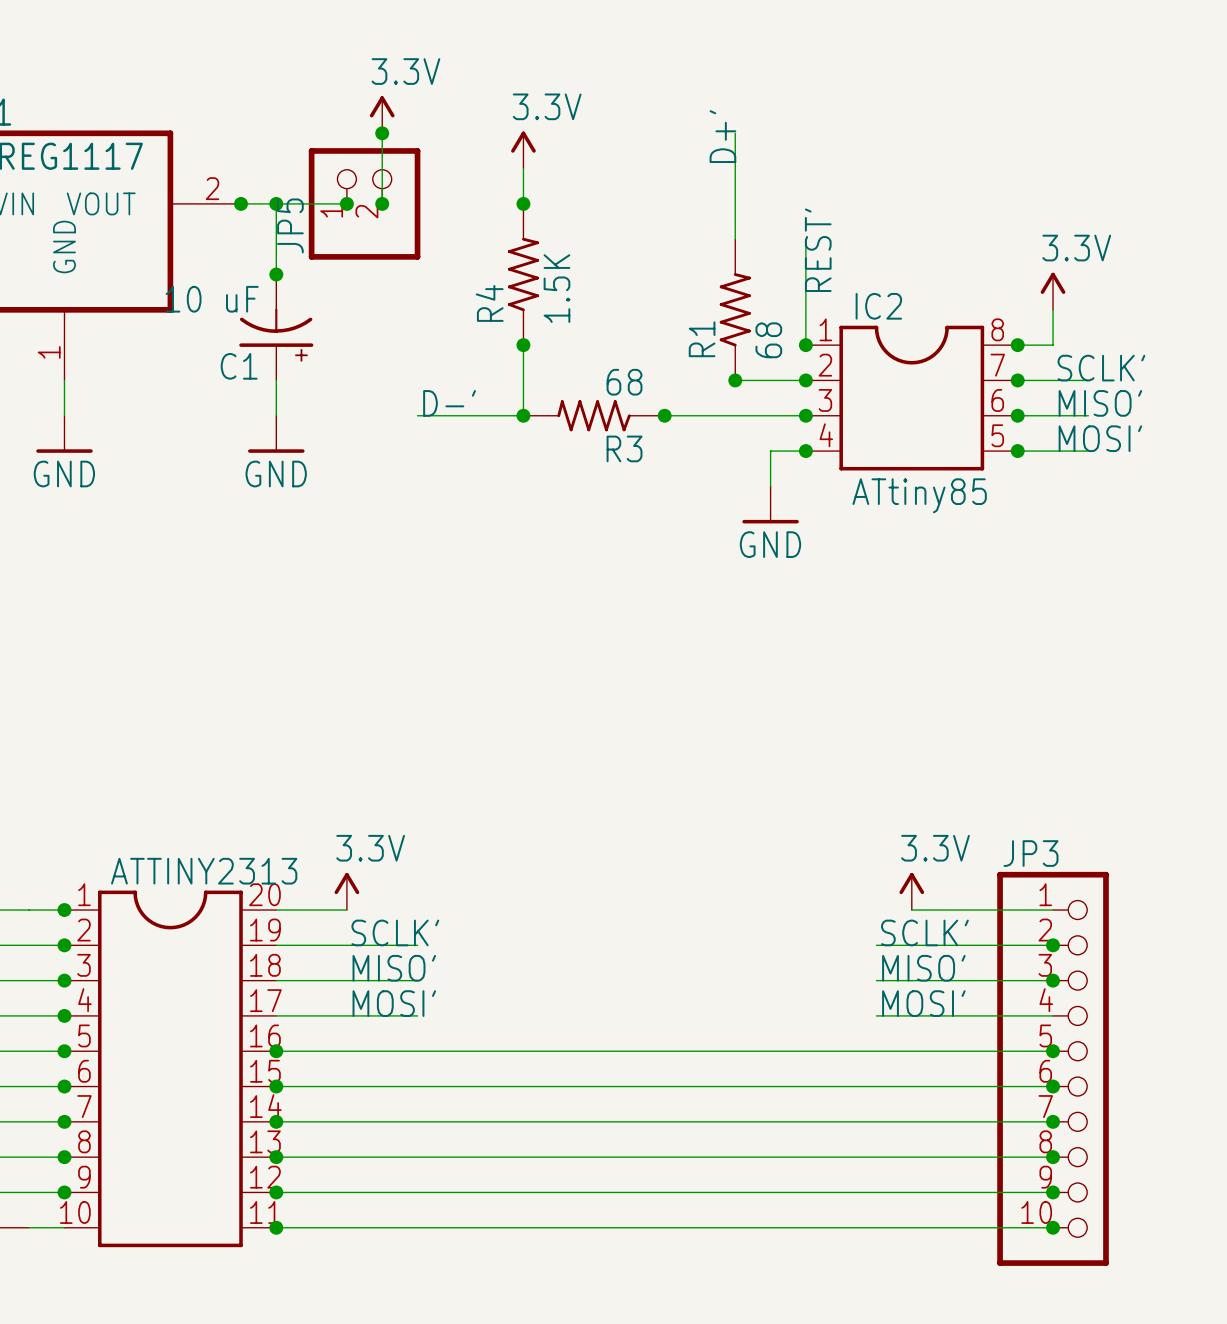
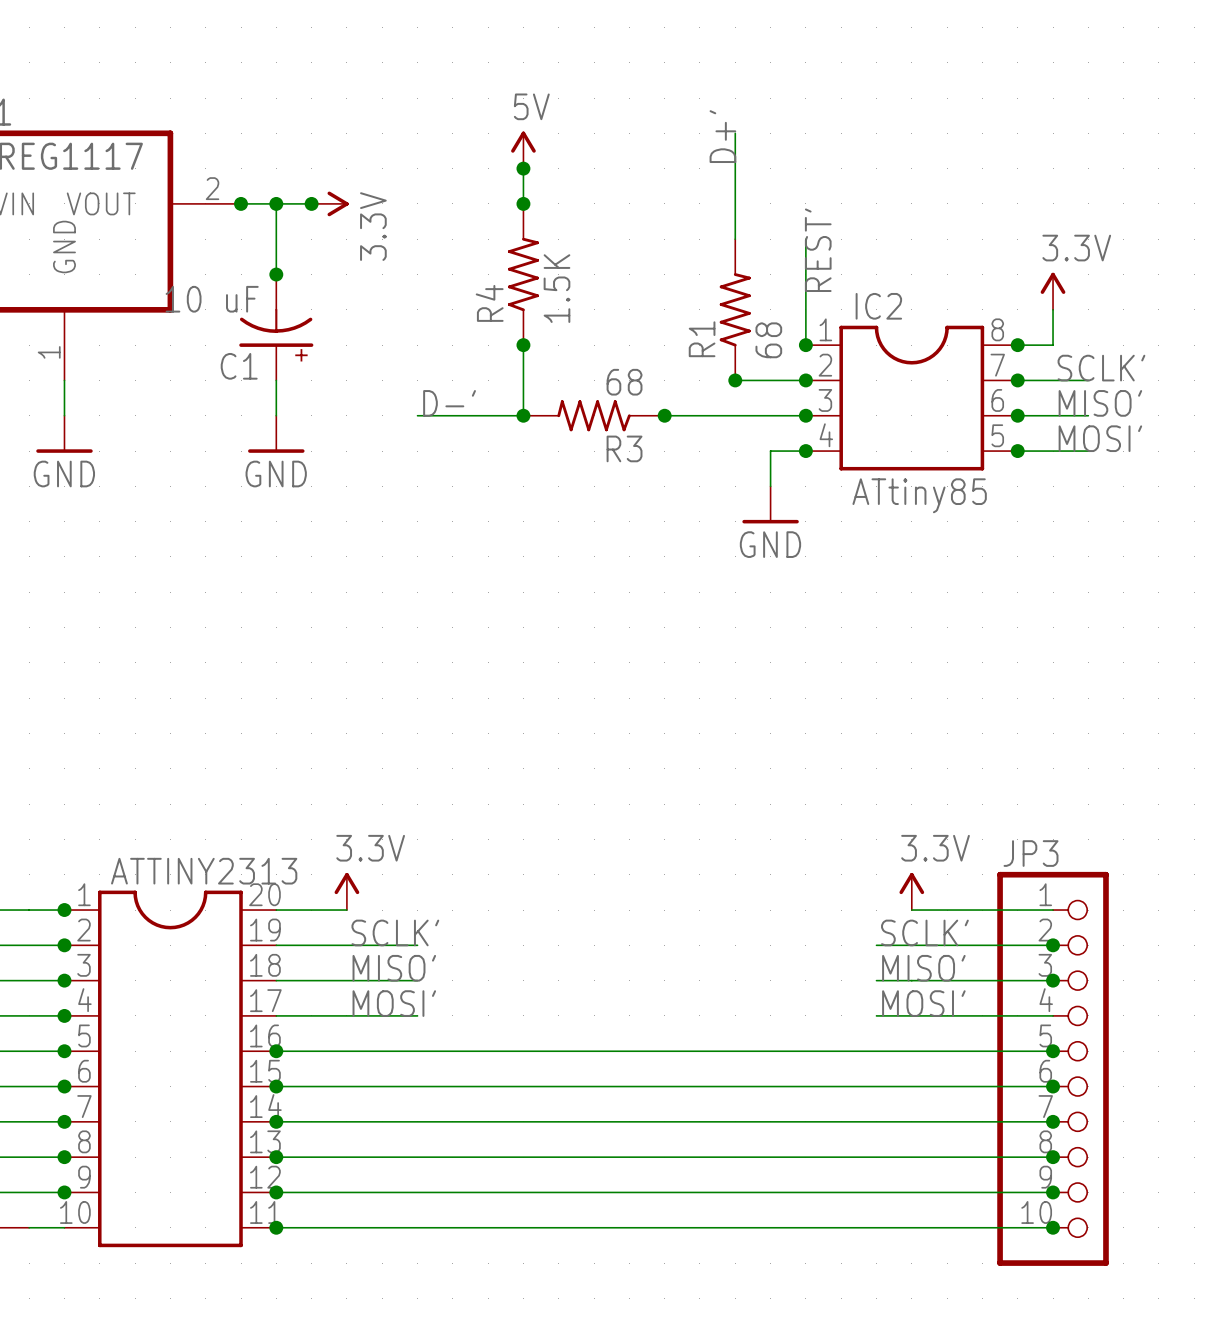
power symbol rotation: 0° (382, 106) -> 90° clockwise (338, 203)
power symbol position: 3.3V (382, 114) -> 3.3V (330, 203)
wire: (382, 133) (382, 203) -> none
junction: (382, 133) -> none
power symbol: 3.3V (523, 150) -> 5V (523, 150)
junction: none -> (523, 168)
junction: none -> (311, 203)
junction: (346, 203) -> none
JP5: (364, 203) -> none
junction: (382, 203) -> none

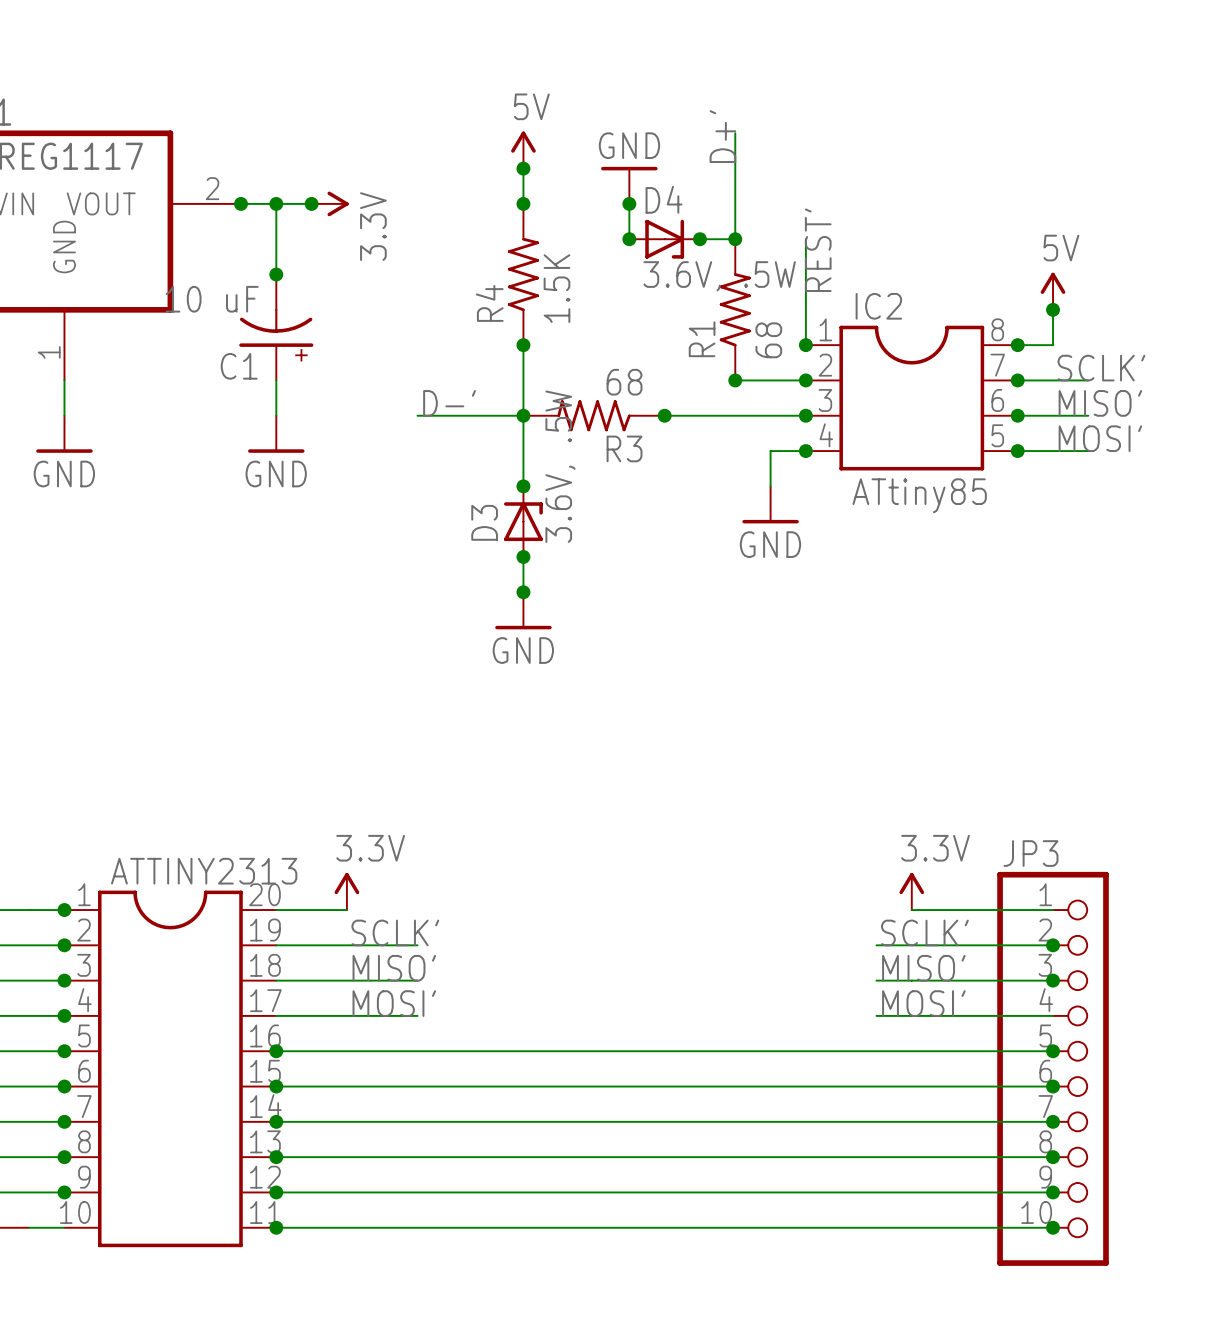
power symbol: none -> GND (629, 185)
wire: none -> (629, 203) (629, 239)
junction: none -> (629, 203)
junction: none -> (629, 239)
D4: none -> 3.6V, .5W (664, 239)
wire: none -> (699, 239) (735, 239)
junction: none -> (699, 239)
junction: none -> (735, 239)
power symbol: 3.3V (1053, 291) -> 5V (1053, 291)
junction: none -> (1053, 309)
wire: none -> (523, 415) (523, 486)
junction: none -> (523, 486)
D3: none -> 3.6V, .5W (523, 521)
wire: none -> (523, 556) (523, 592)
junction: none -> (523, 556)
junction: none -> (523, 592)
power symbol: none -> GND (523, 610)

